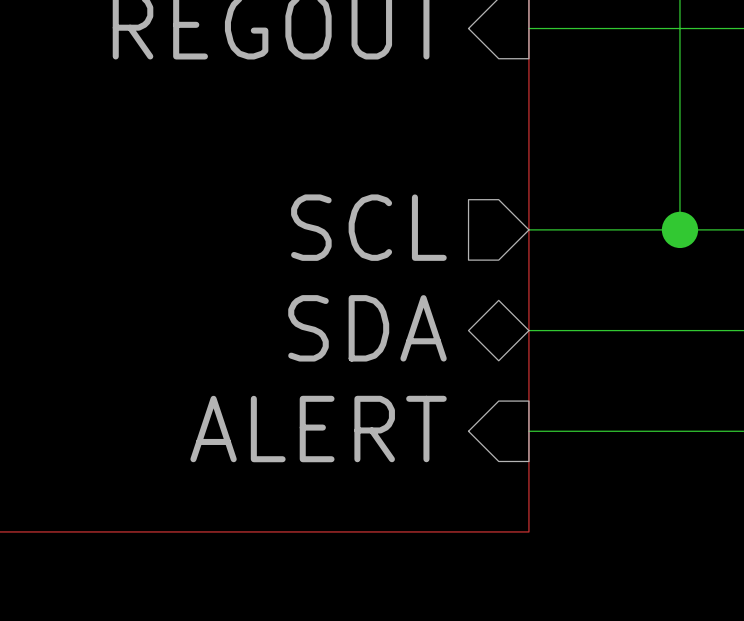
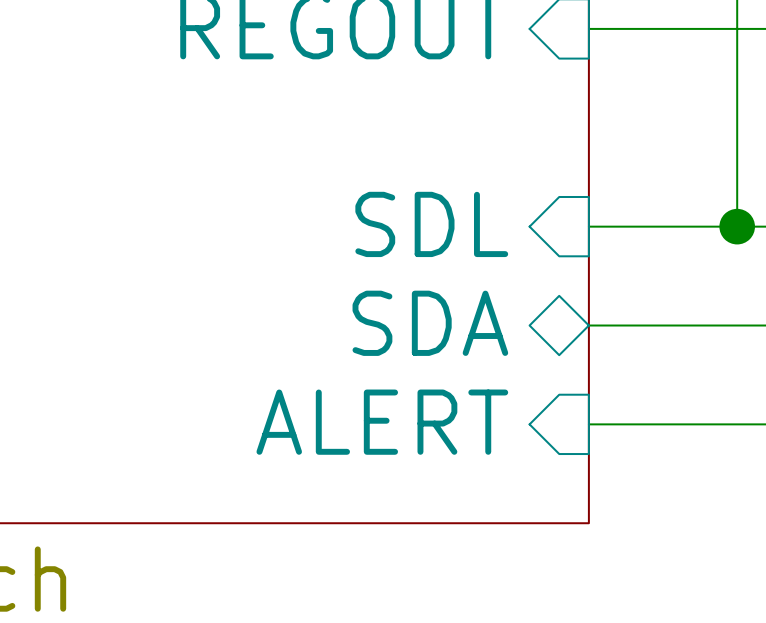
sheet pin shape: output (368, 227) -> input (431, 224)
sheet pin: SCL (368, 227) -> SDL (431, 224)

